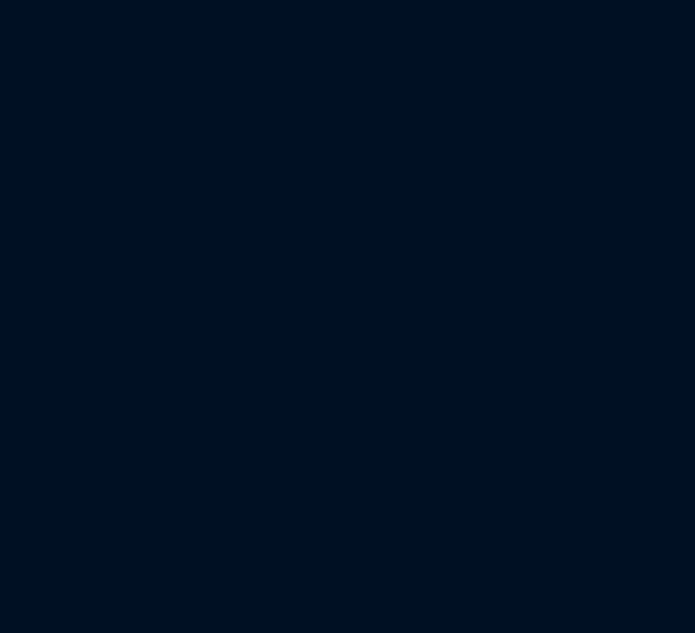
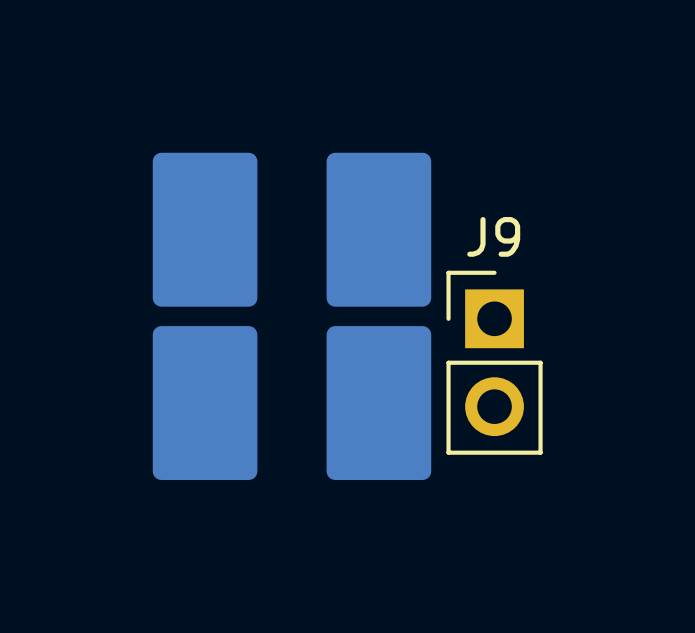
part: none -> (291, 229)
J9: none -> (494, 362)
part: none -> (291, 403)

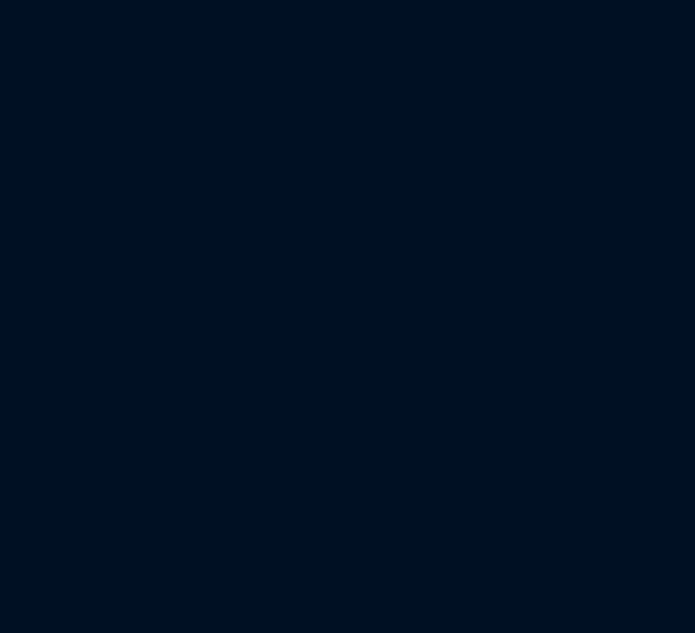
part: (291, 229) -> none
J9: (494, 362) -> none
part: (291, 403) -> none

